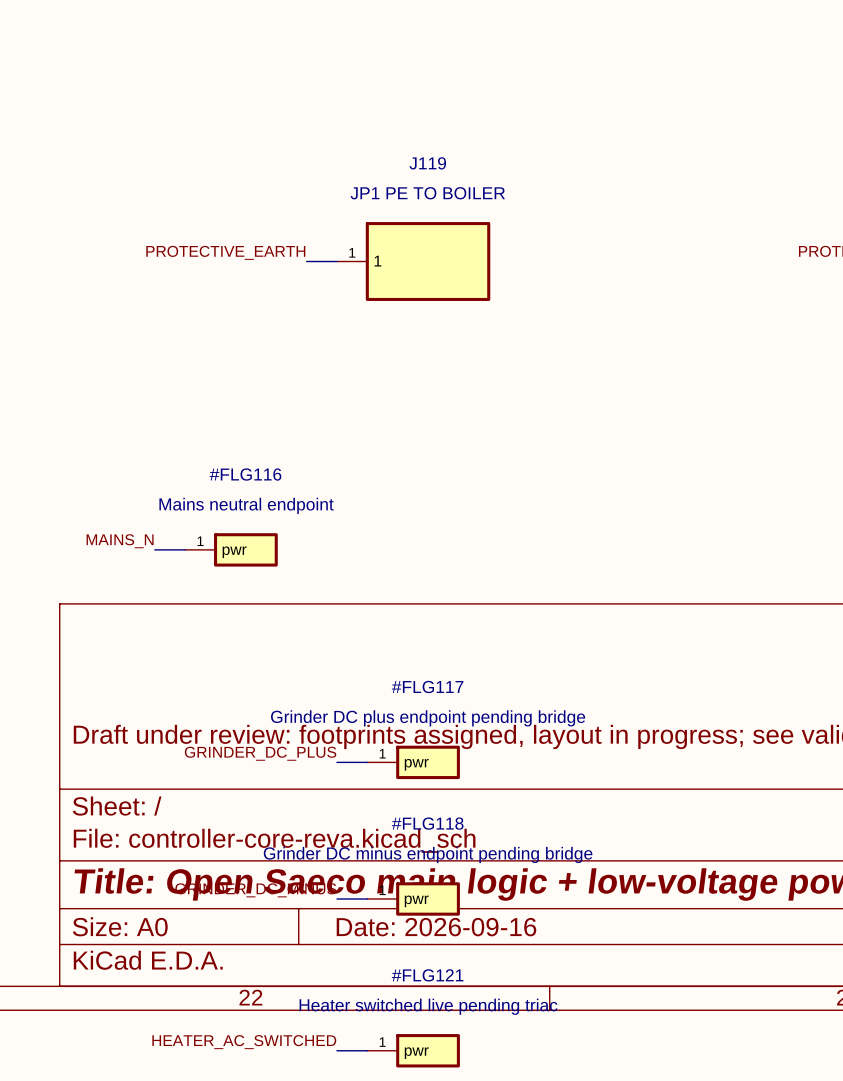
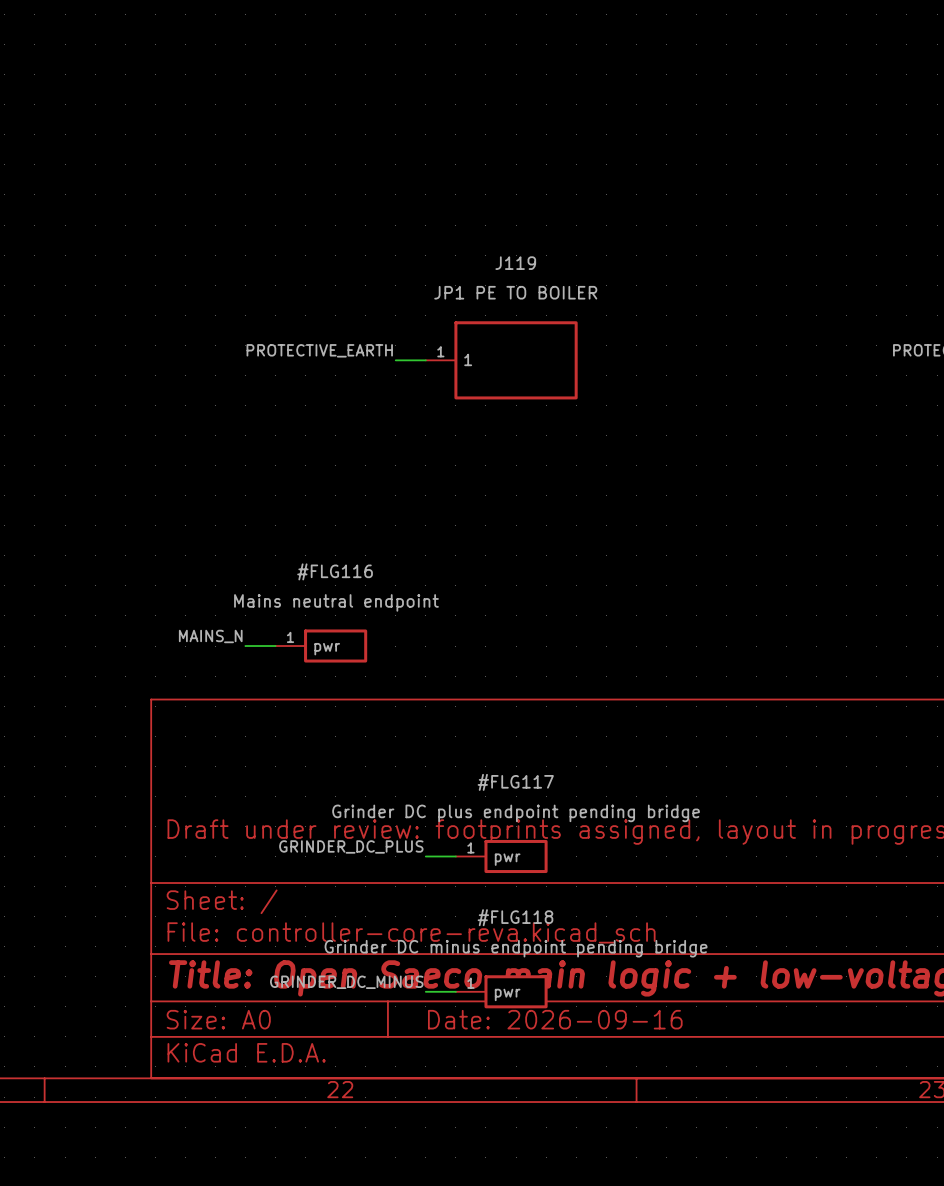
label: HEATER_AC_SWITCHED (244, 1042) -> none
wire: (336, 1050) (367, 1050) -> none
#FLG121: Heater switched live pending triac (413, 1050) -> none

